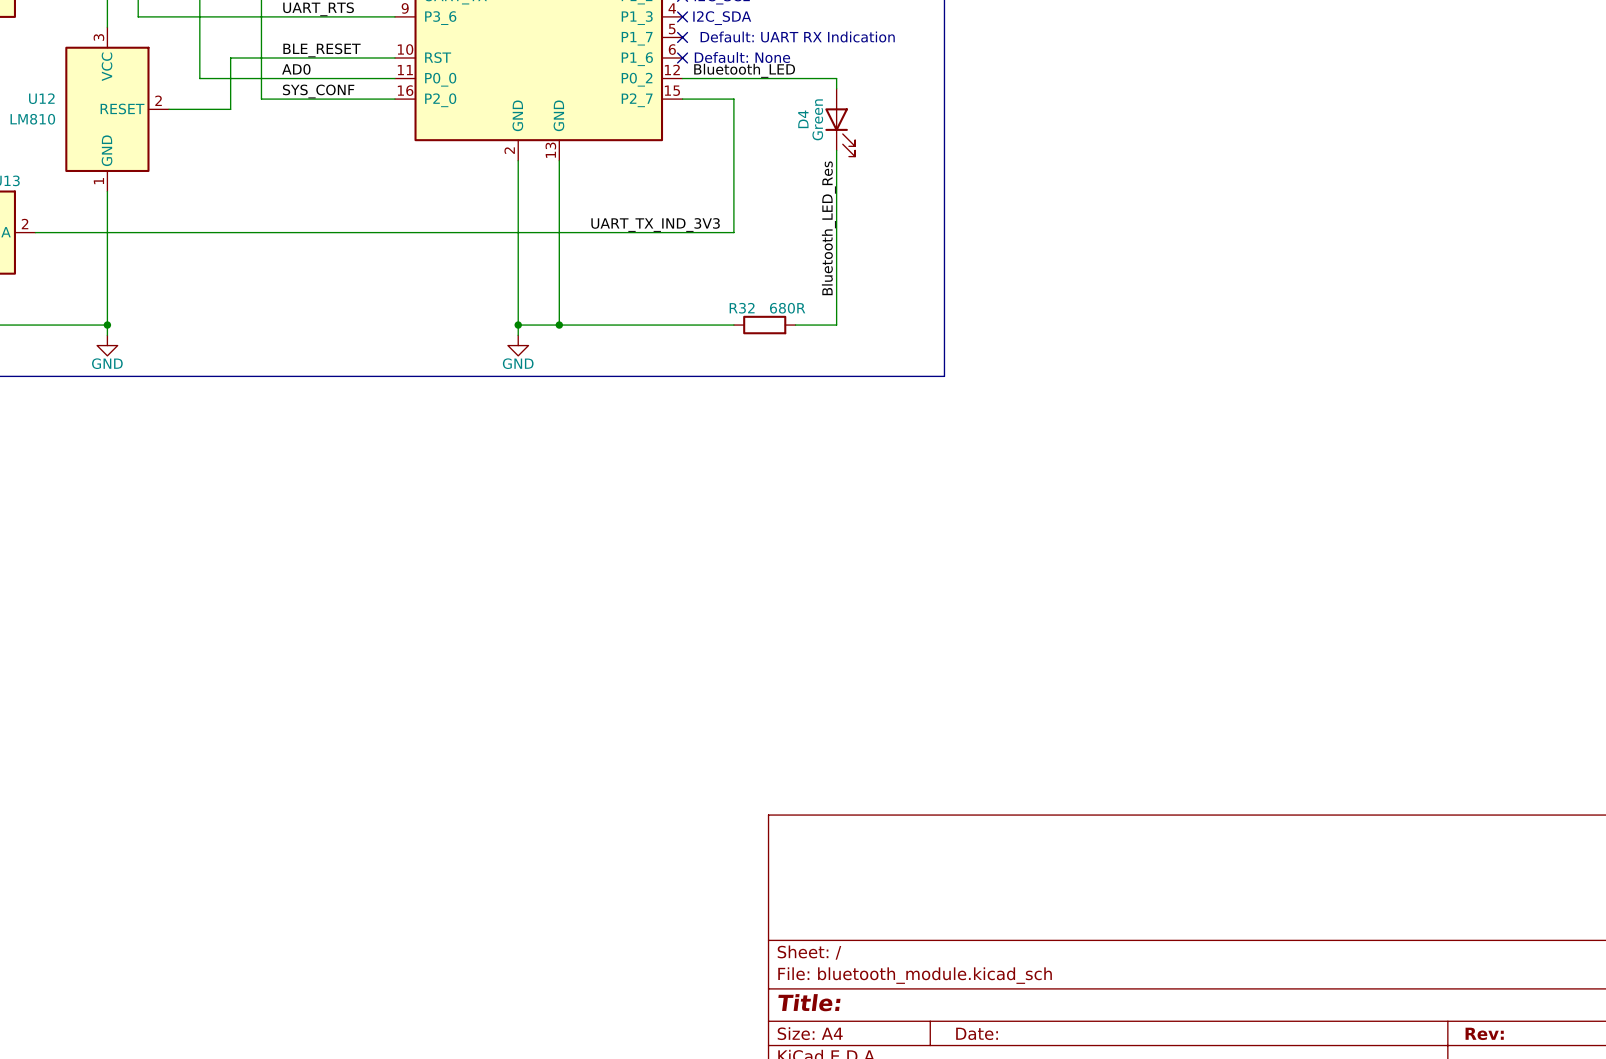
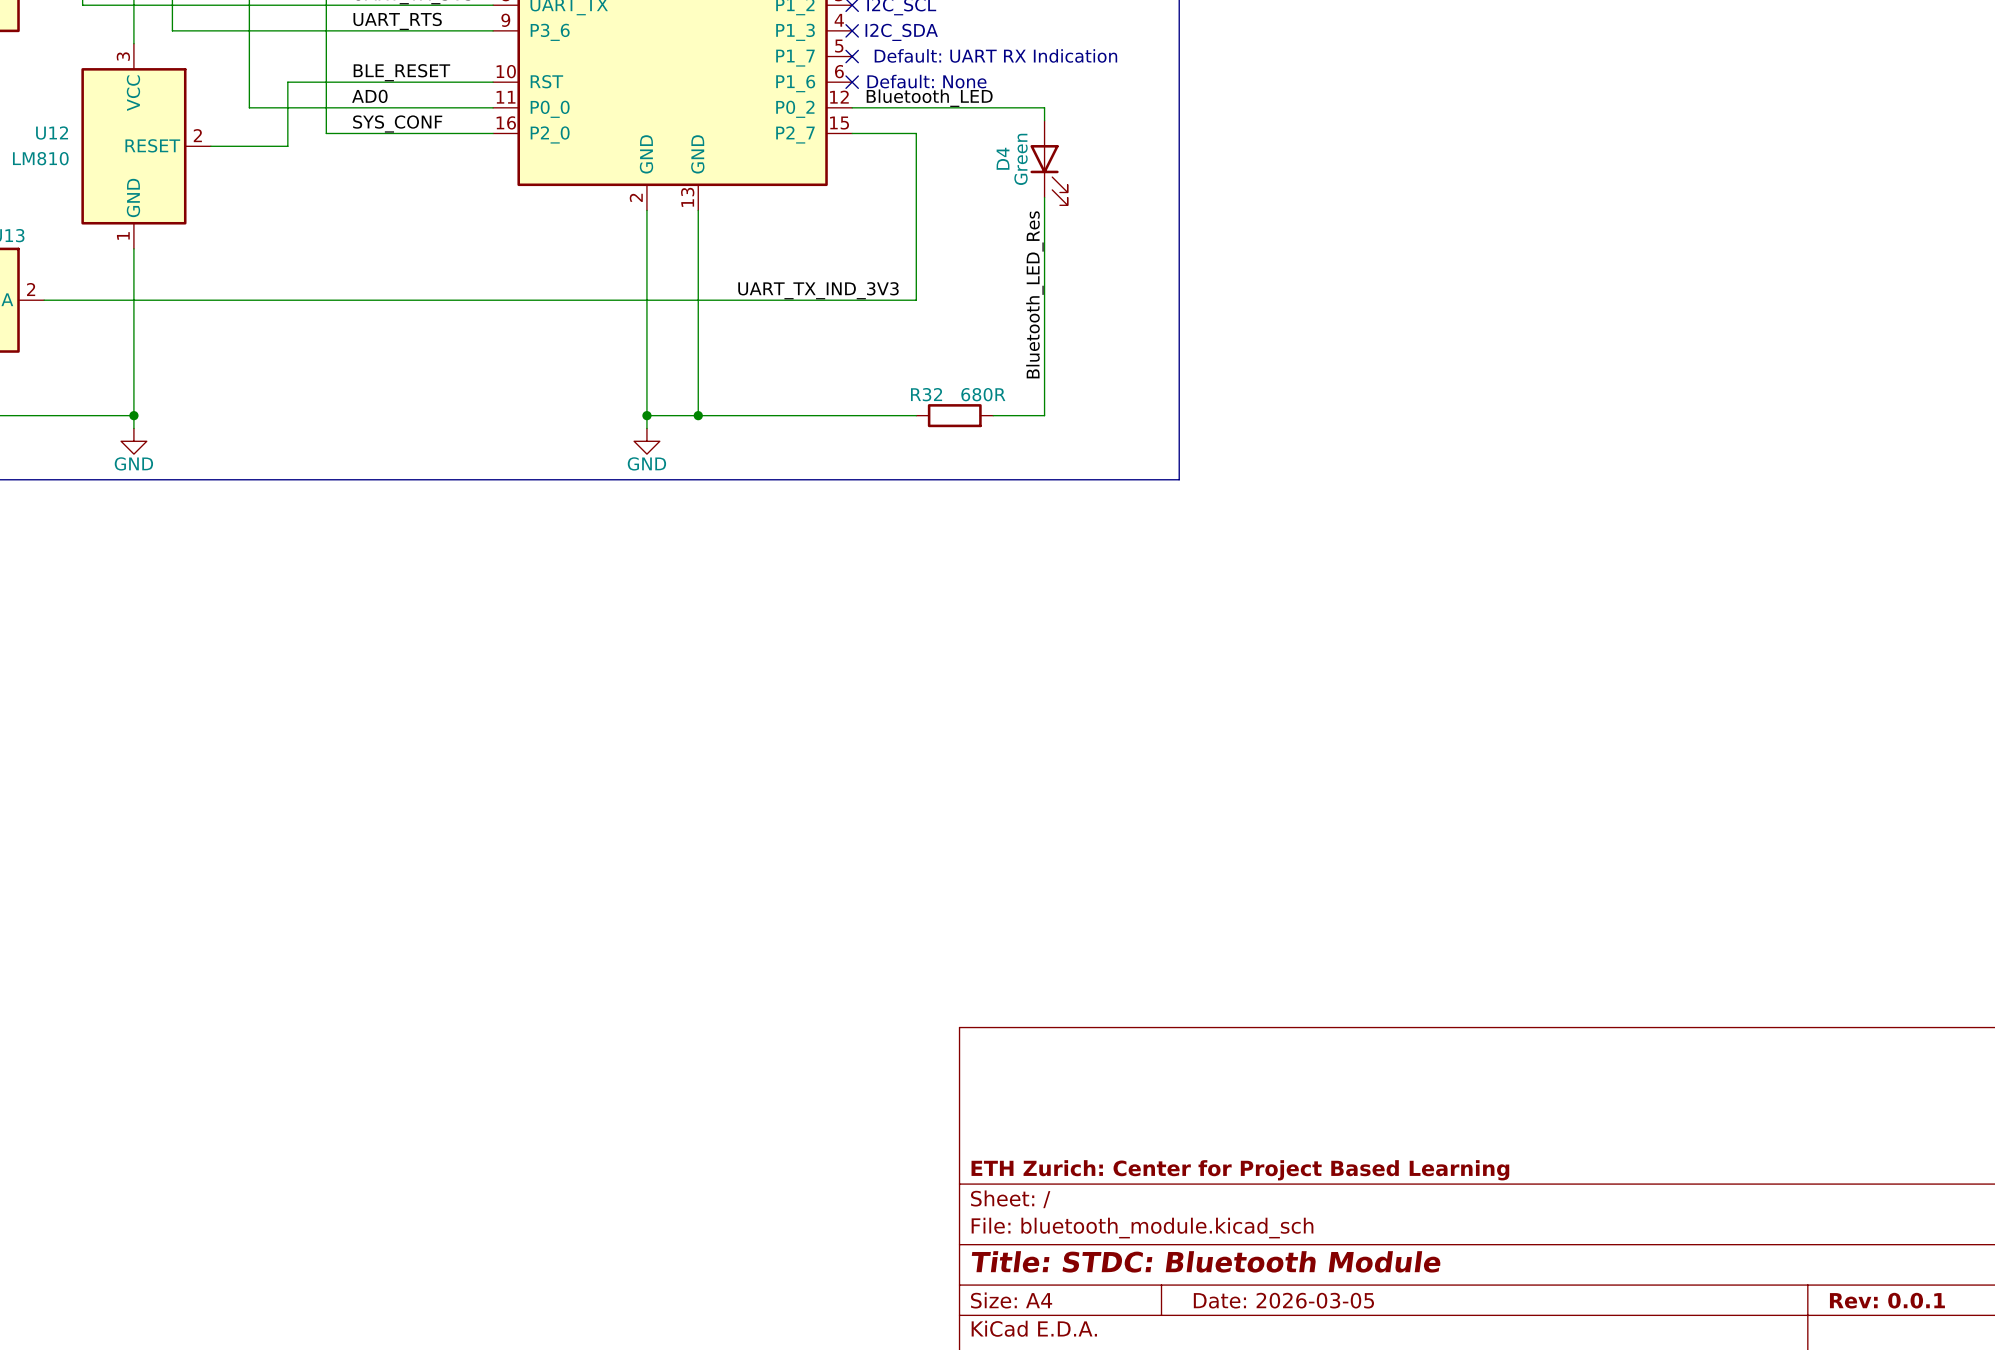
title block: none -> ETH Zurich: Center for Project Based Learning (1240, 1170)
title block: Title: (809, 1002) -> Title: STDC: Bluetooth Module (1206, 1261)
title block: Date: (977, 1033) -> Date: 2026-03-05 (1283, 1300)
title block: Rev: (1484, 1033) -> Rev: 0.0.1 (1887, 1300)

